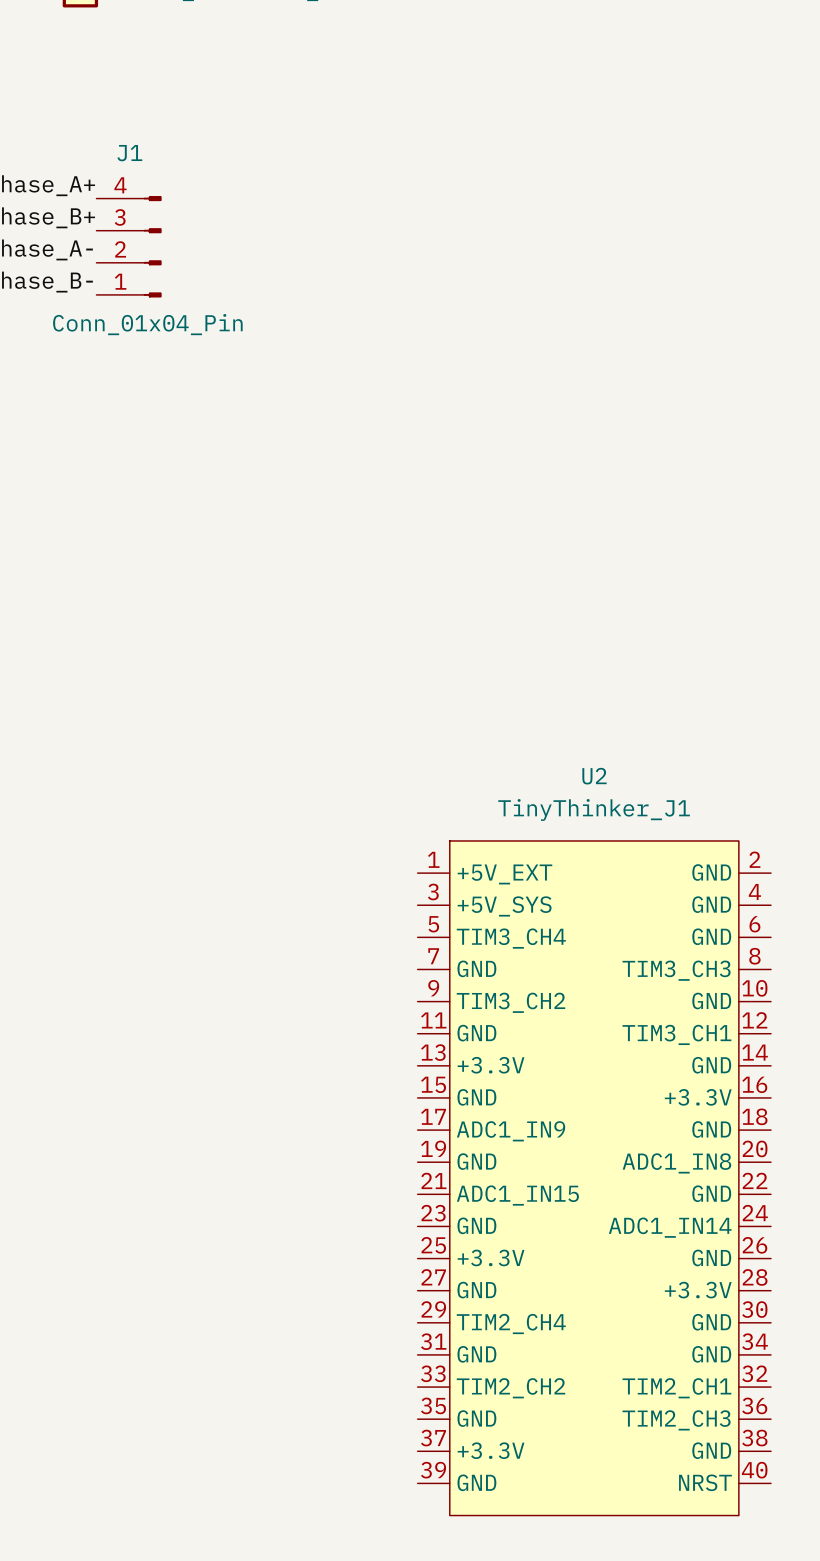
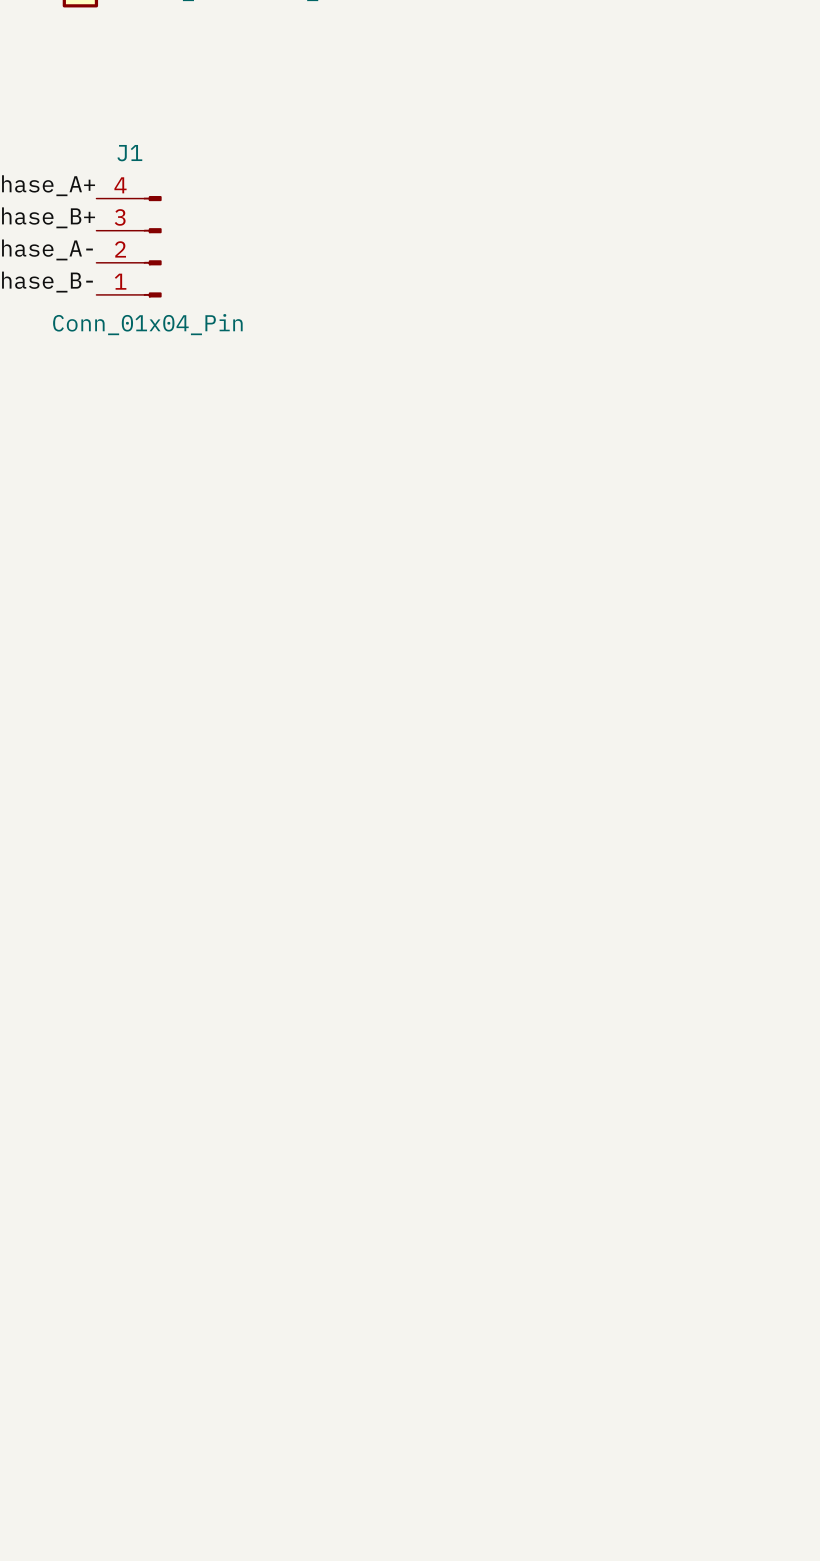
U2: TinyThinker_J1 (594, 1178) -> none

